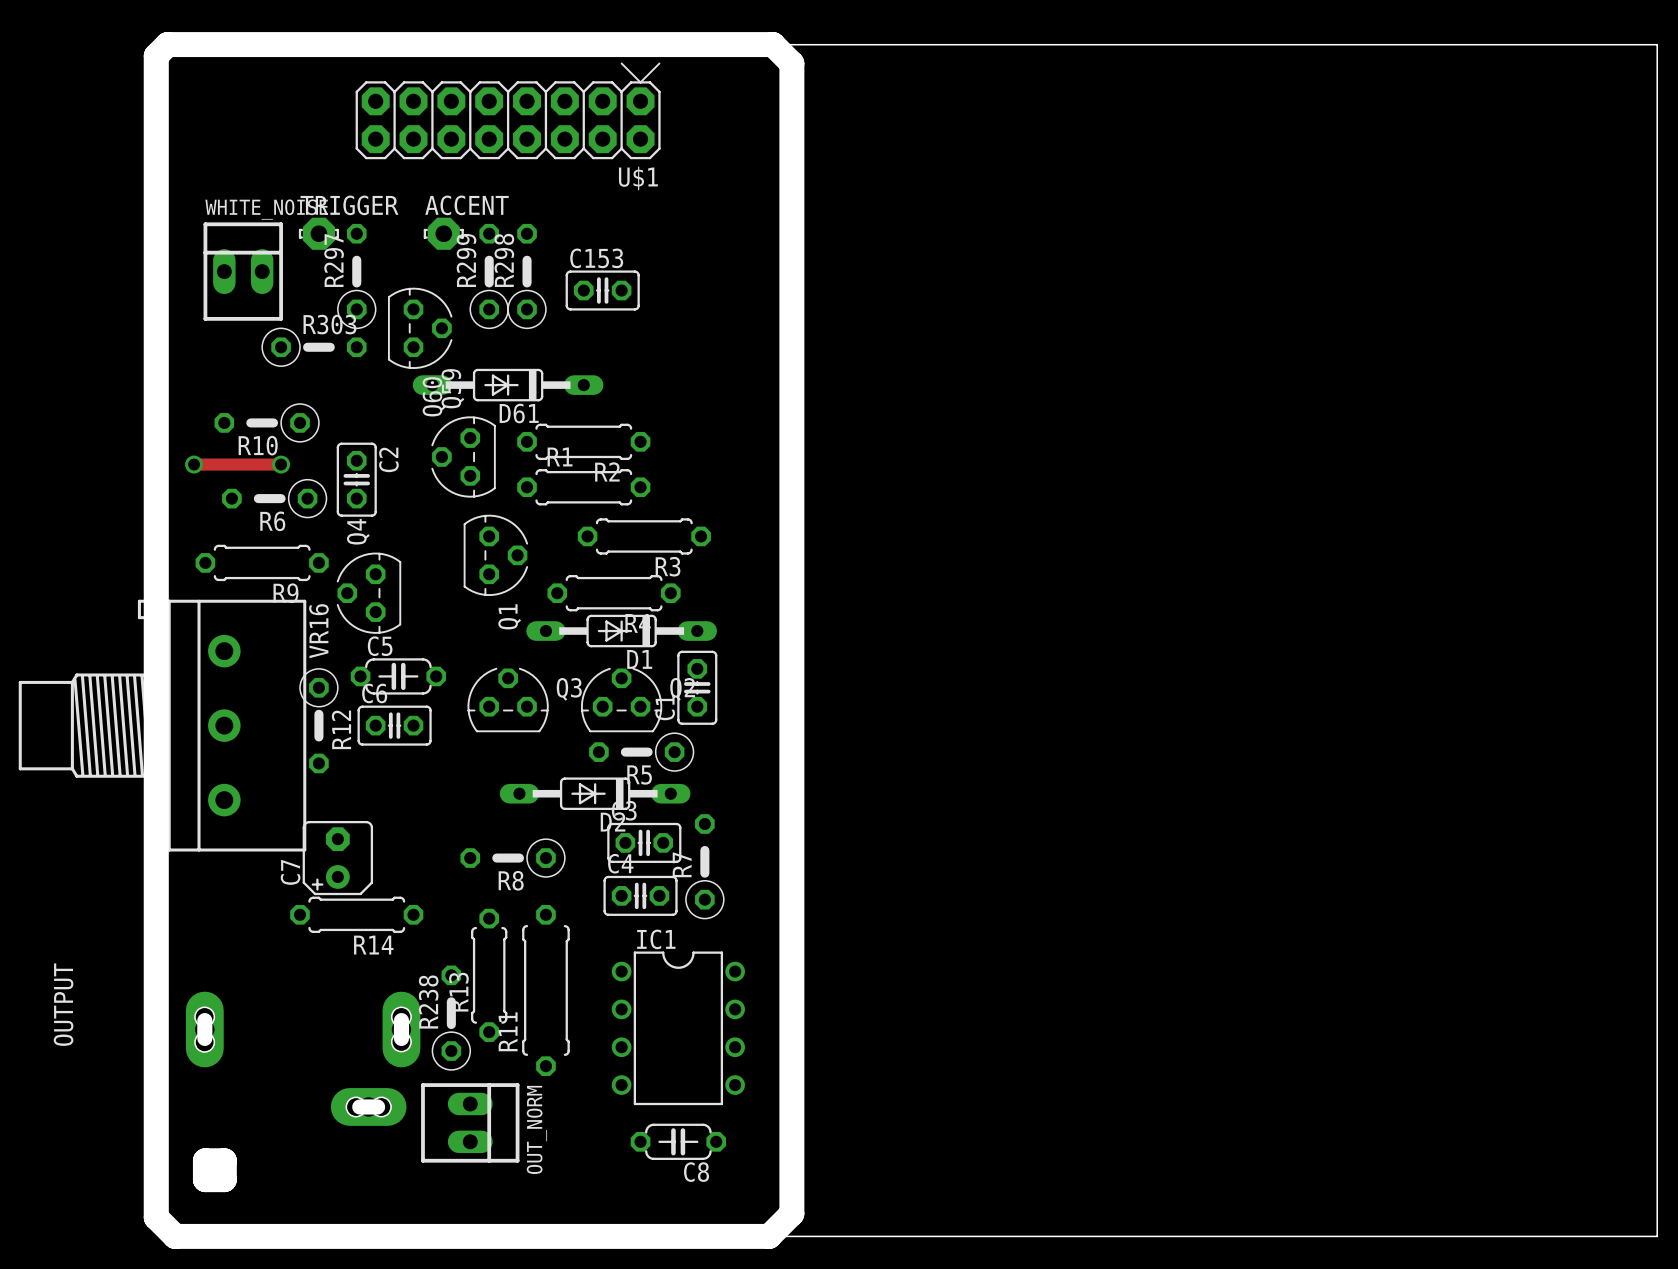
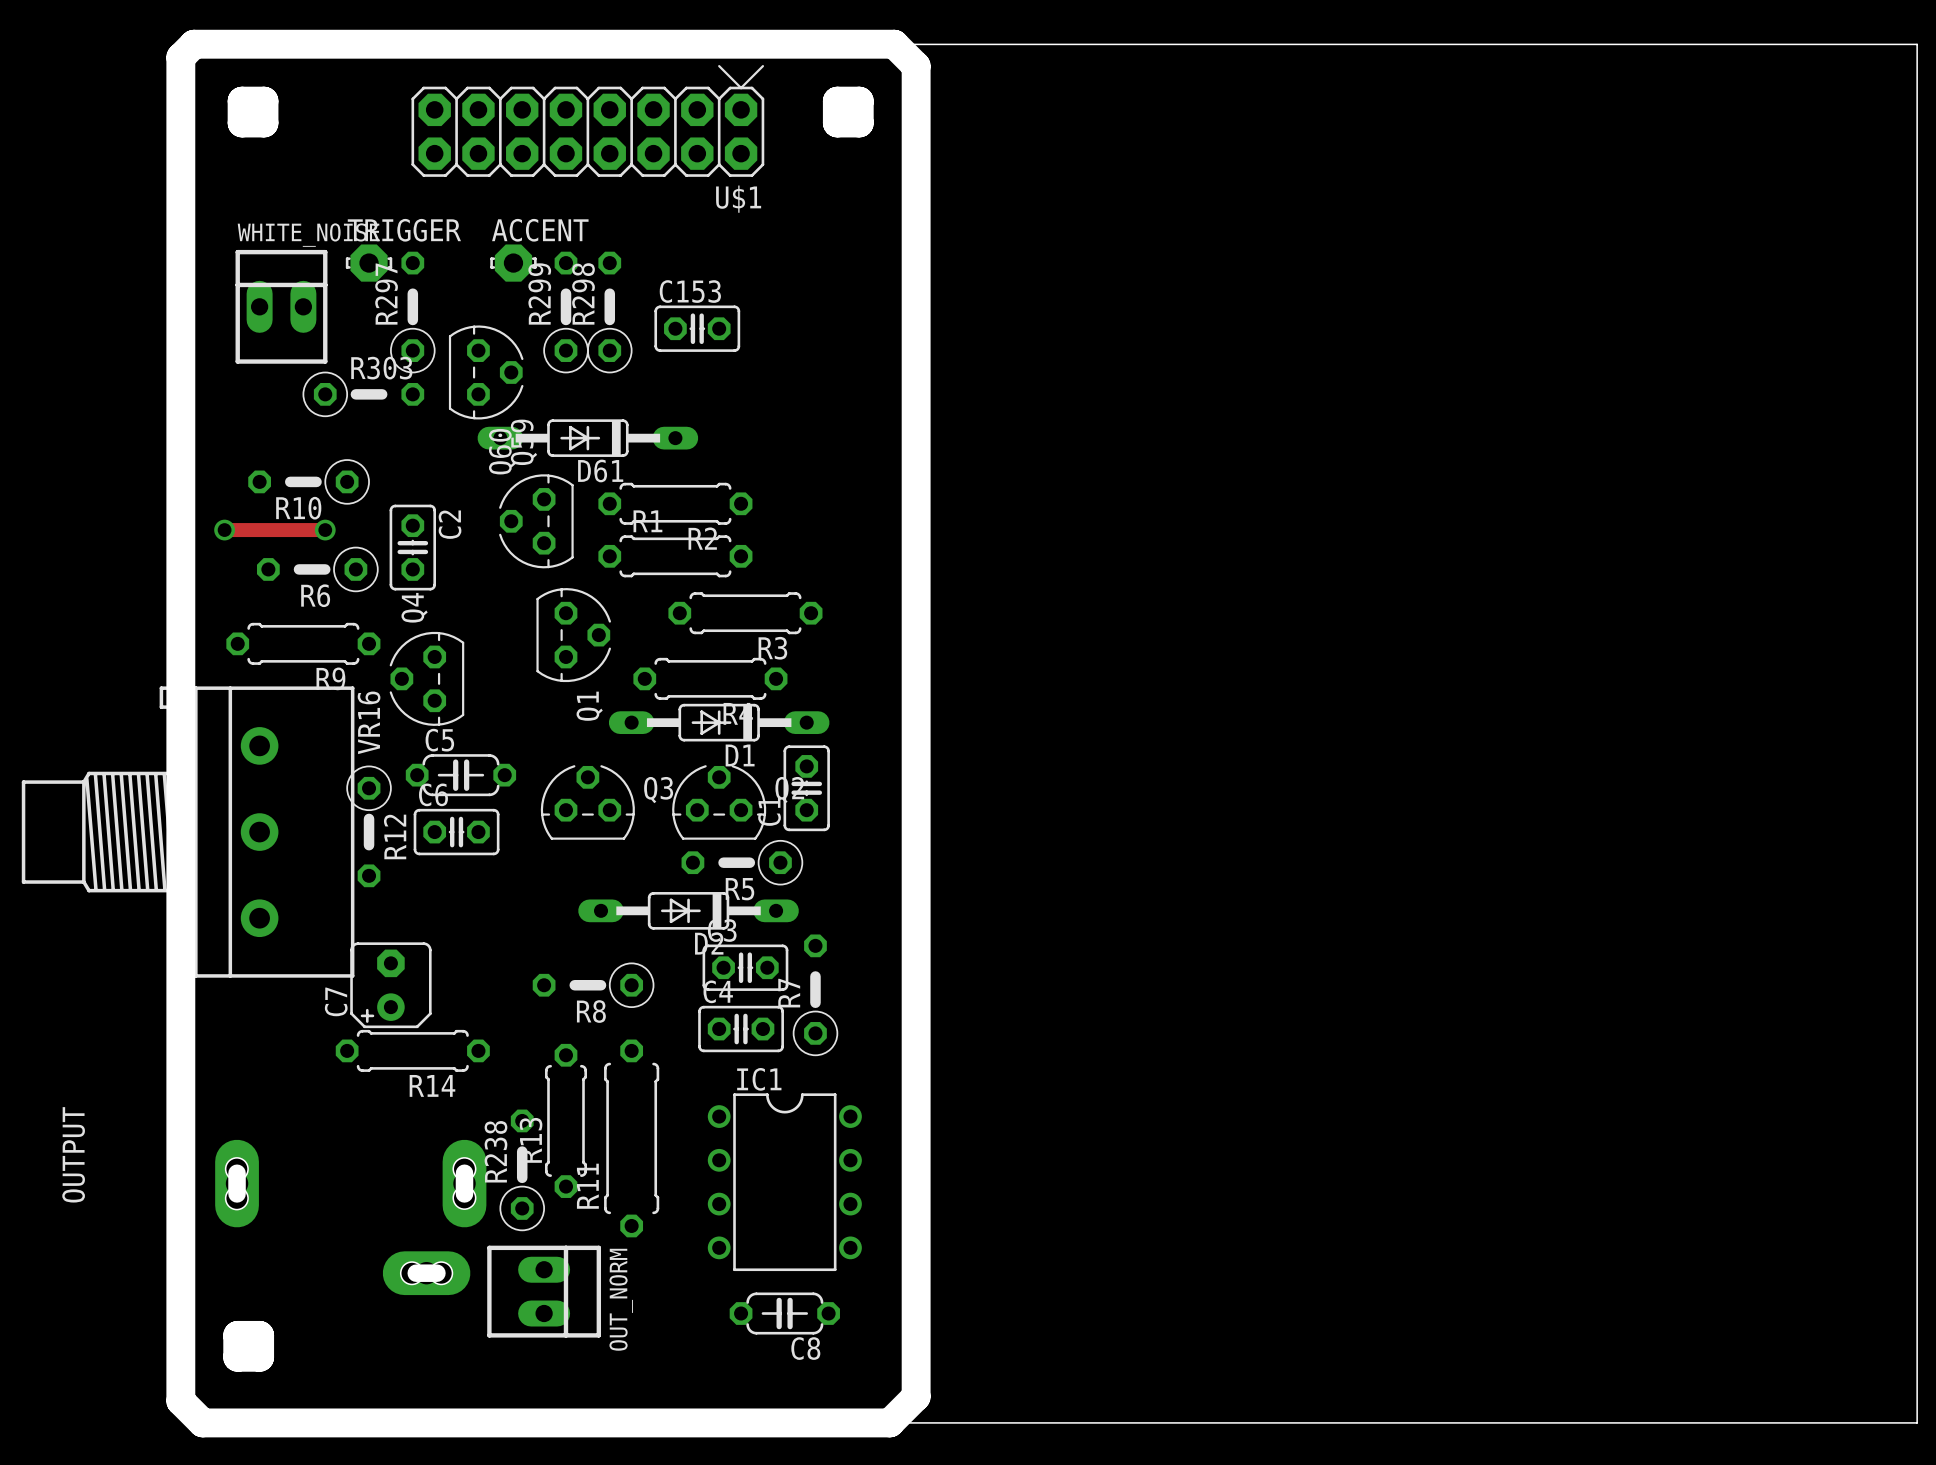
board edge: none -> (242, 101) (263, 101) (263, 123) (242, 123) (242, 101)
board edge: none -> (837, 101) (837, 123) (859, 123) (859, 101) (837, 101)

